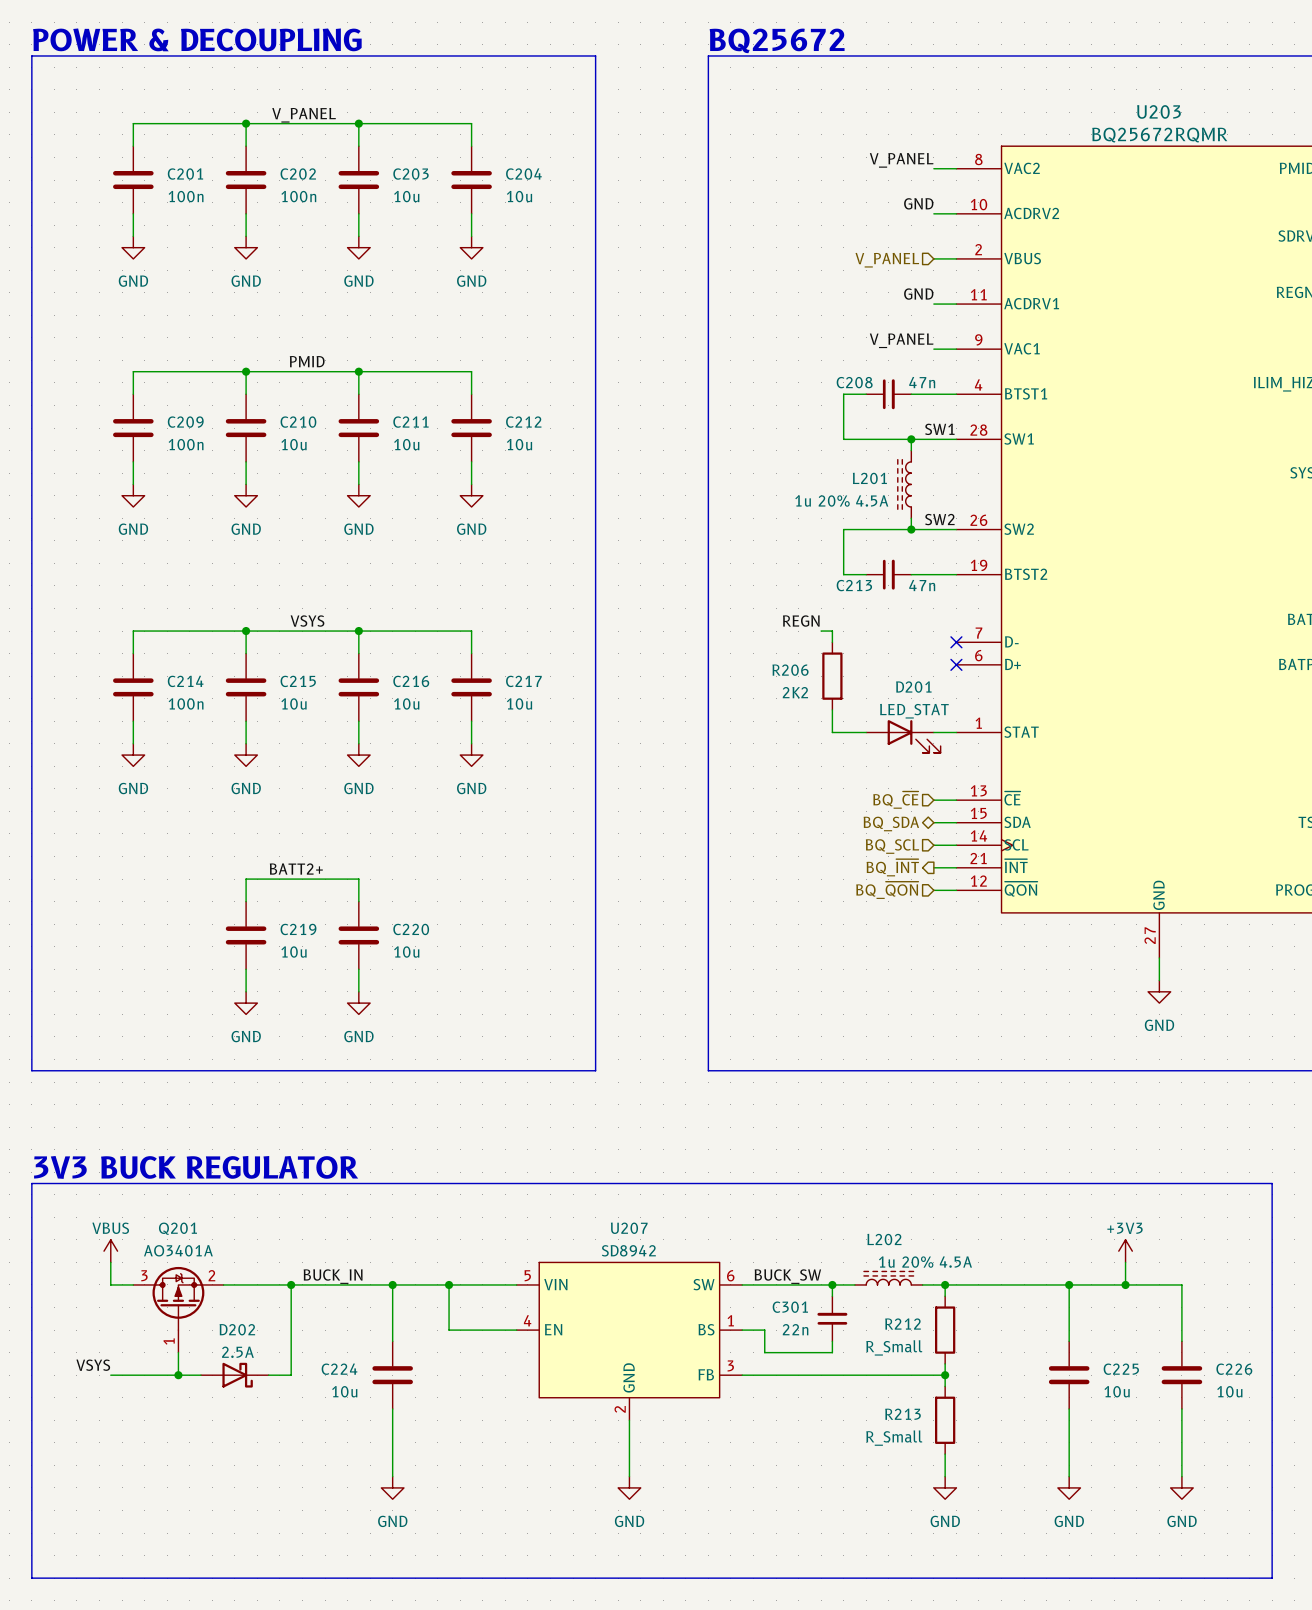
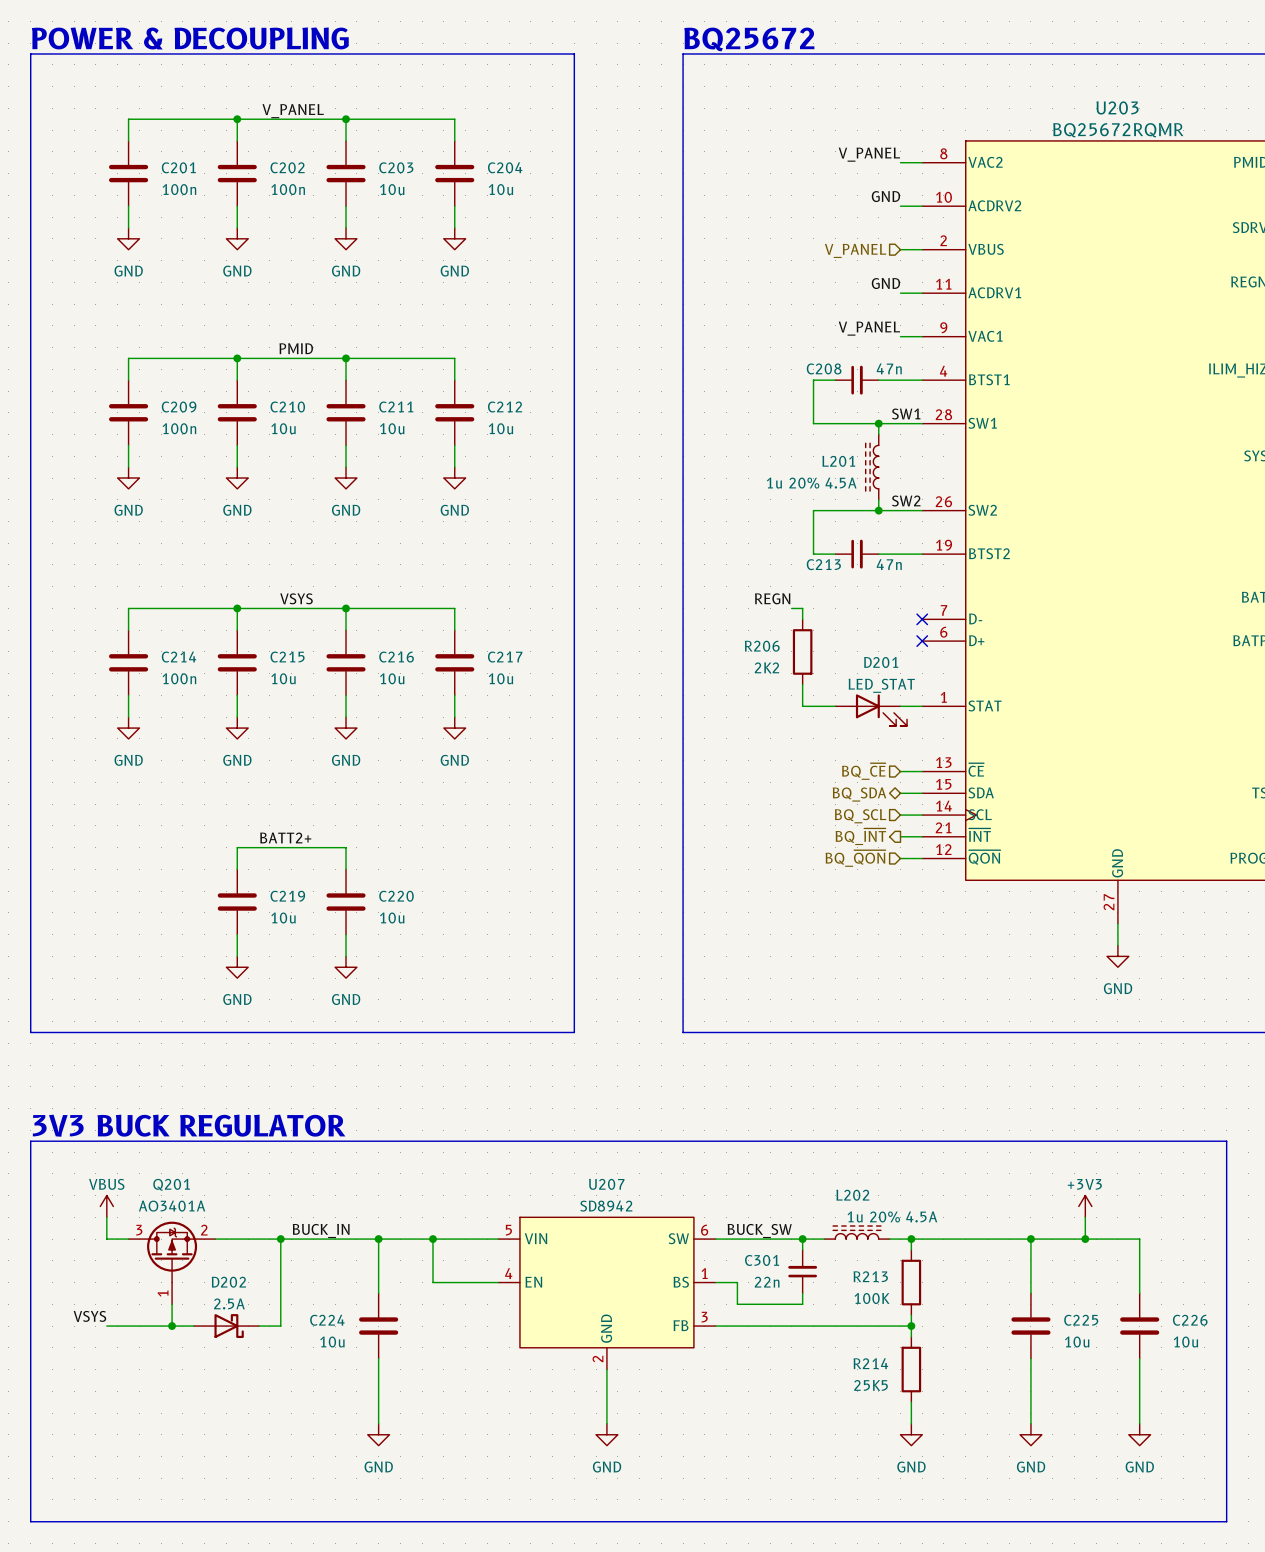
R212 name: R212 (902, 1324) -> R213 (870, 1276)
R212 value: R_Small (894, 1347) -> 100K (872, 1298)
R213 name: R213 (902, 1414) -> R214 (870, 1363)
R213 value: R_Small (894, 1438) -> 25K5 (871, 1385)

